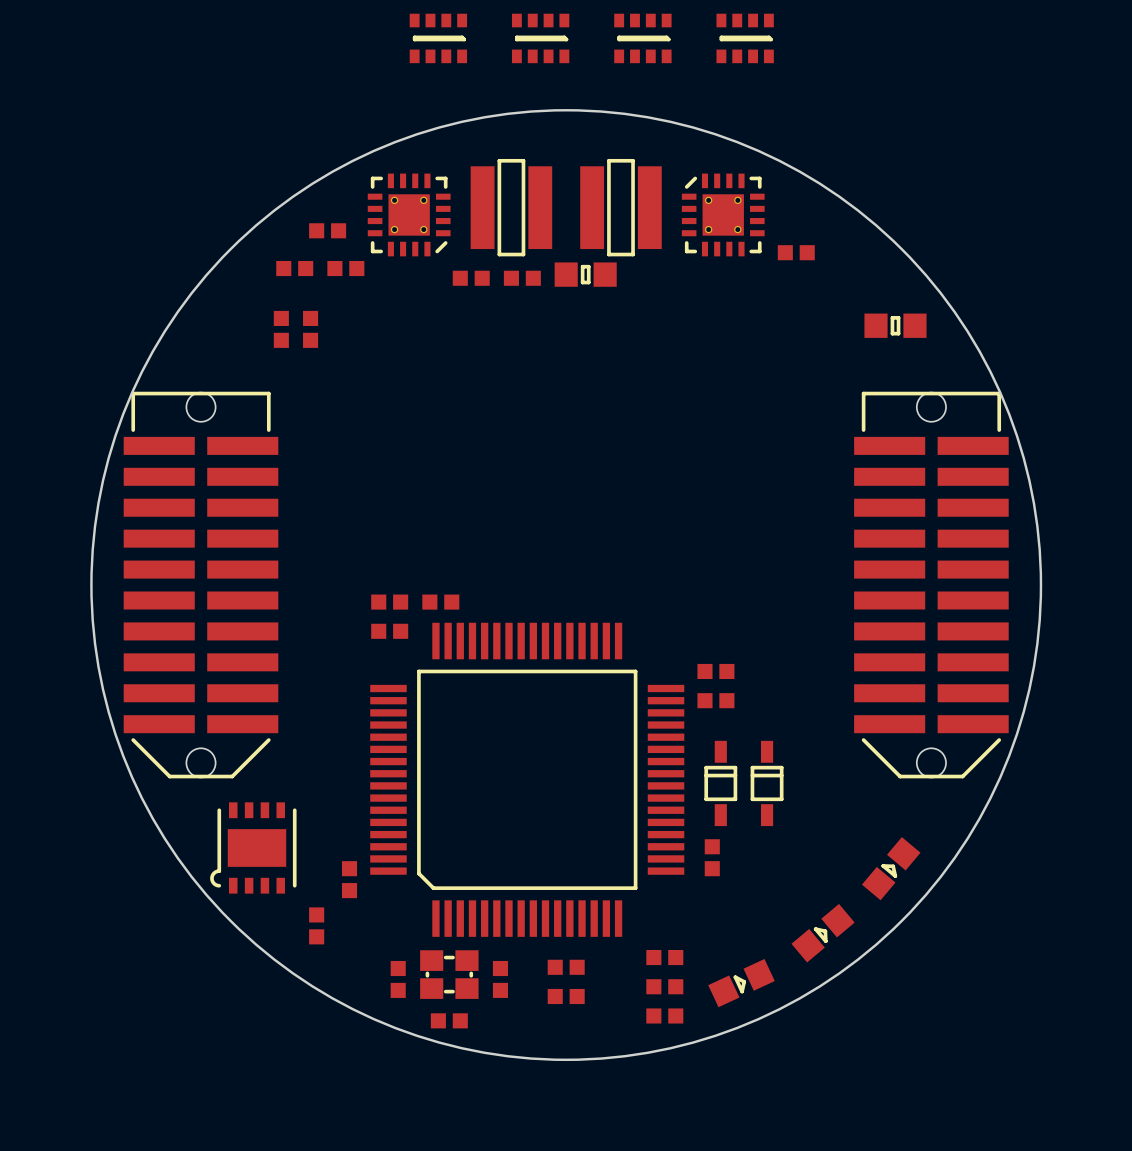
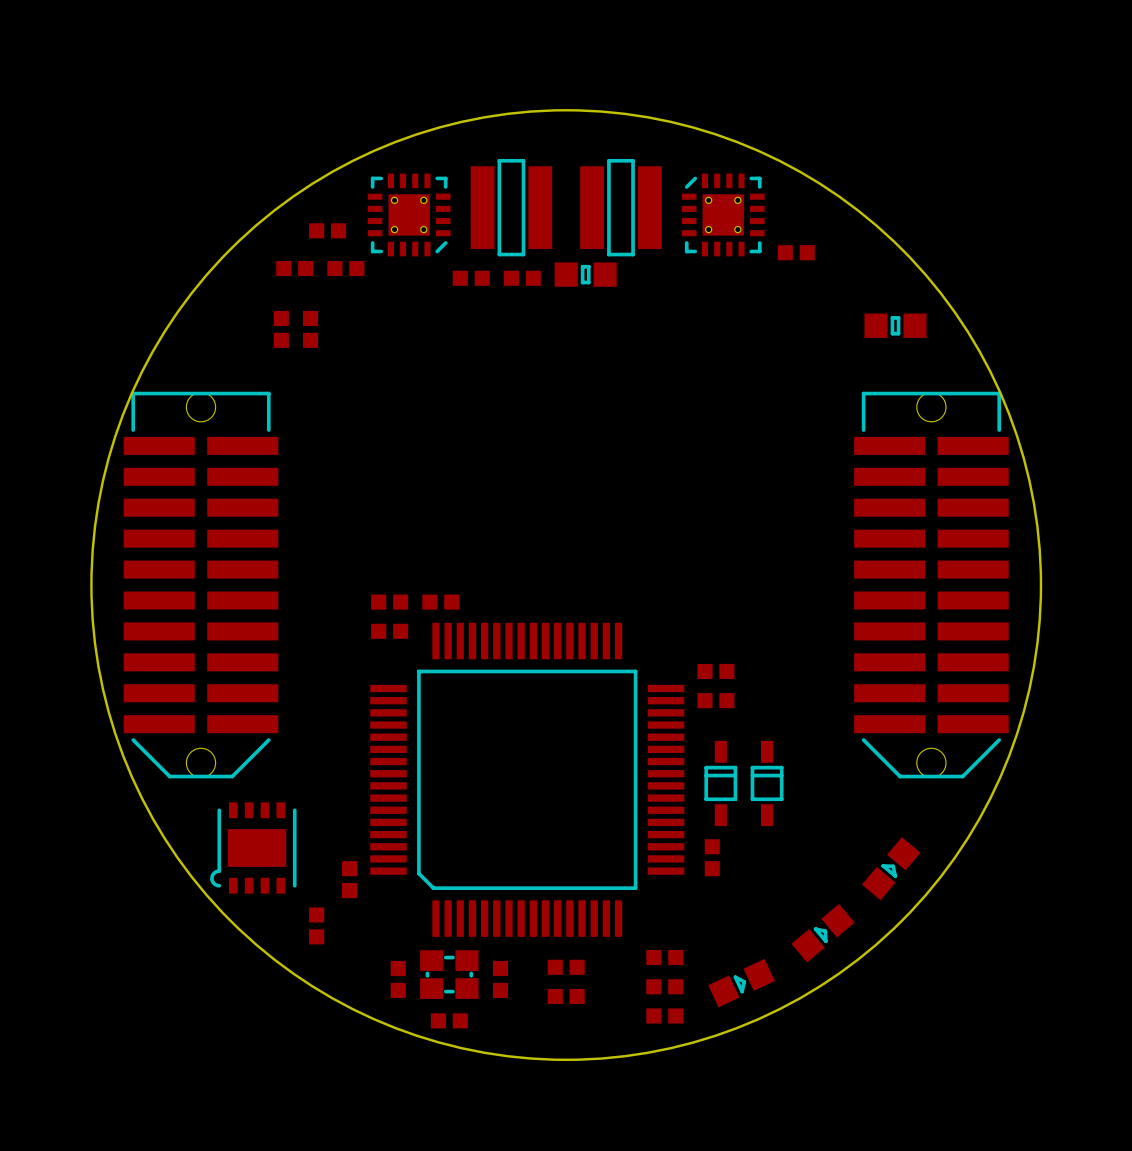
part: (438, 38) -> none
part: (540, 38) -> none
part: (642, 38) -> none
part: (745, 38) -> none

